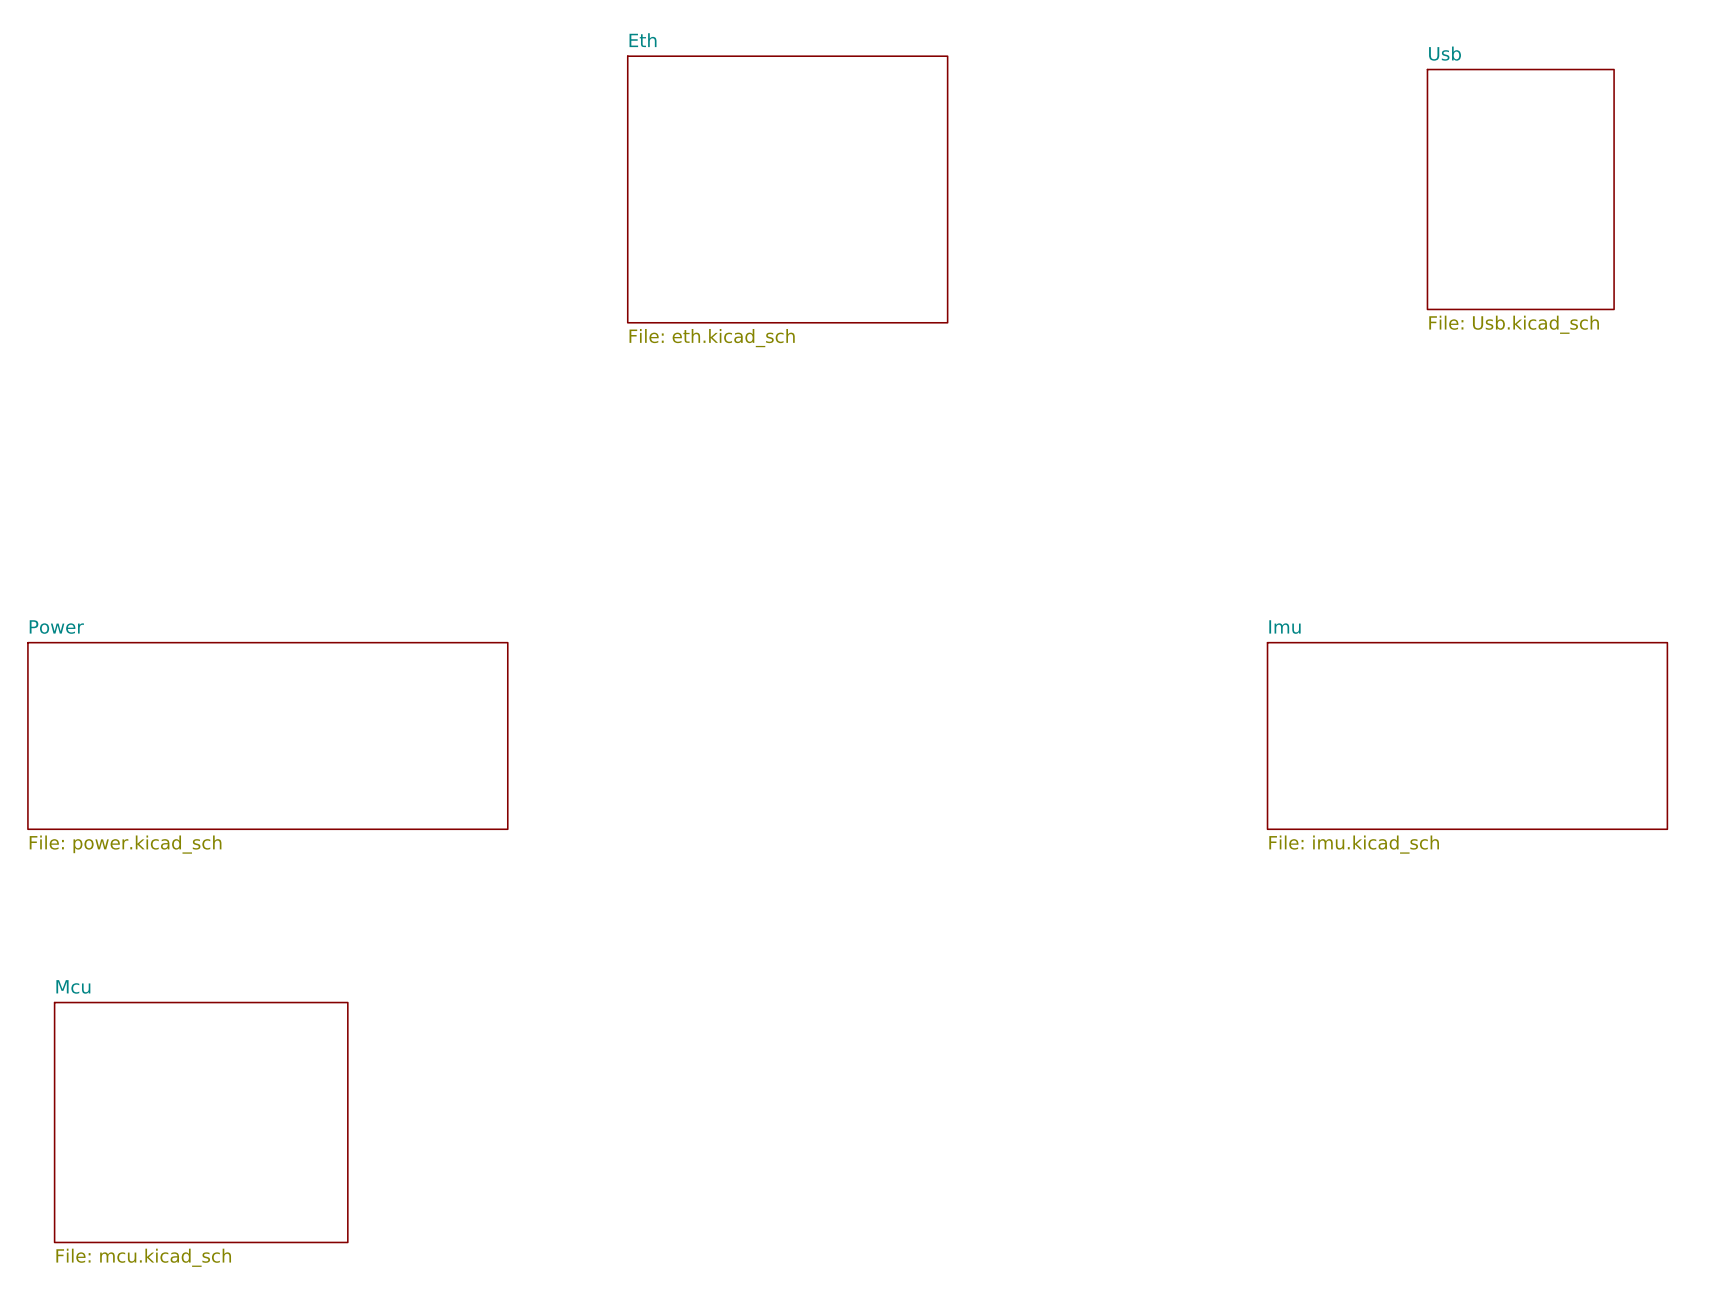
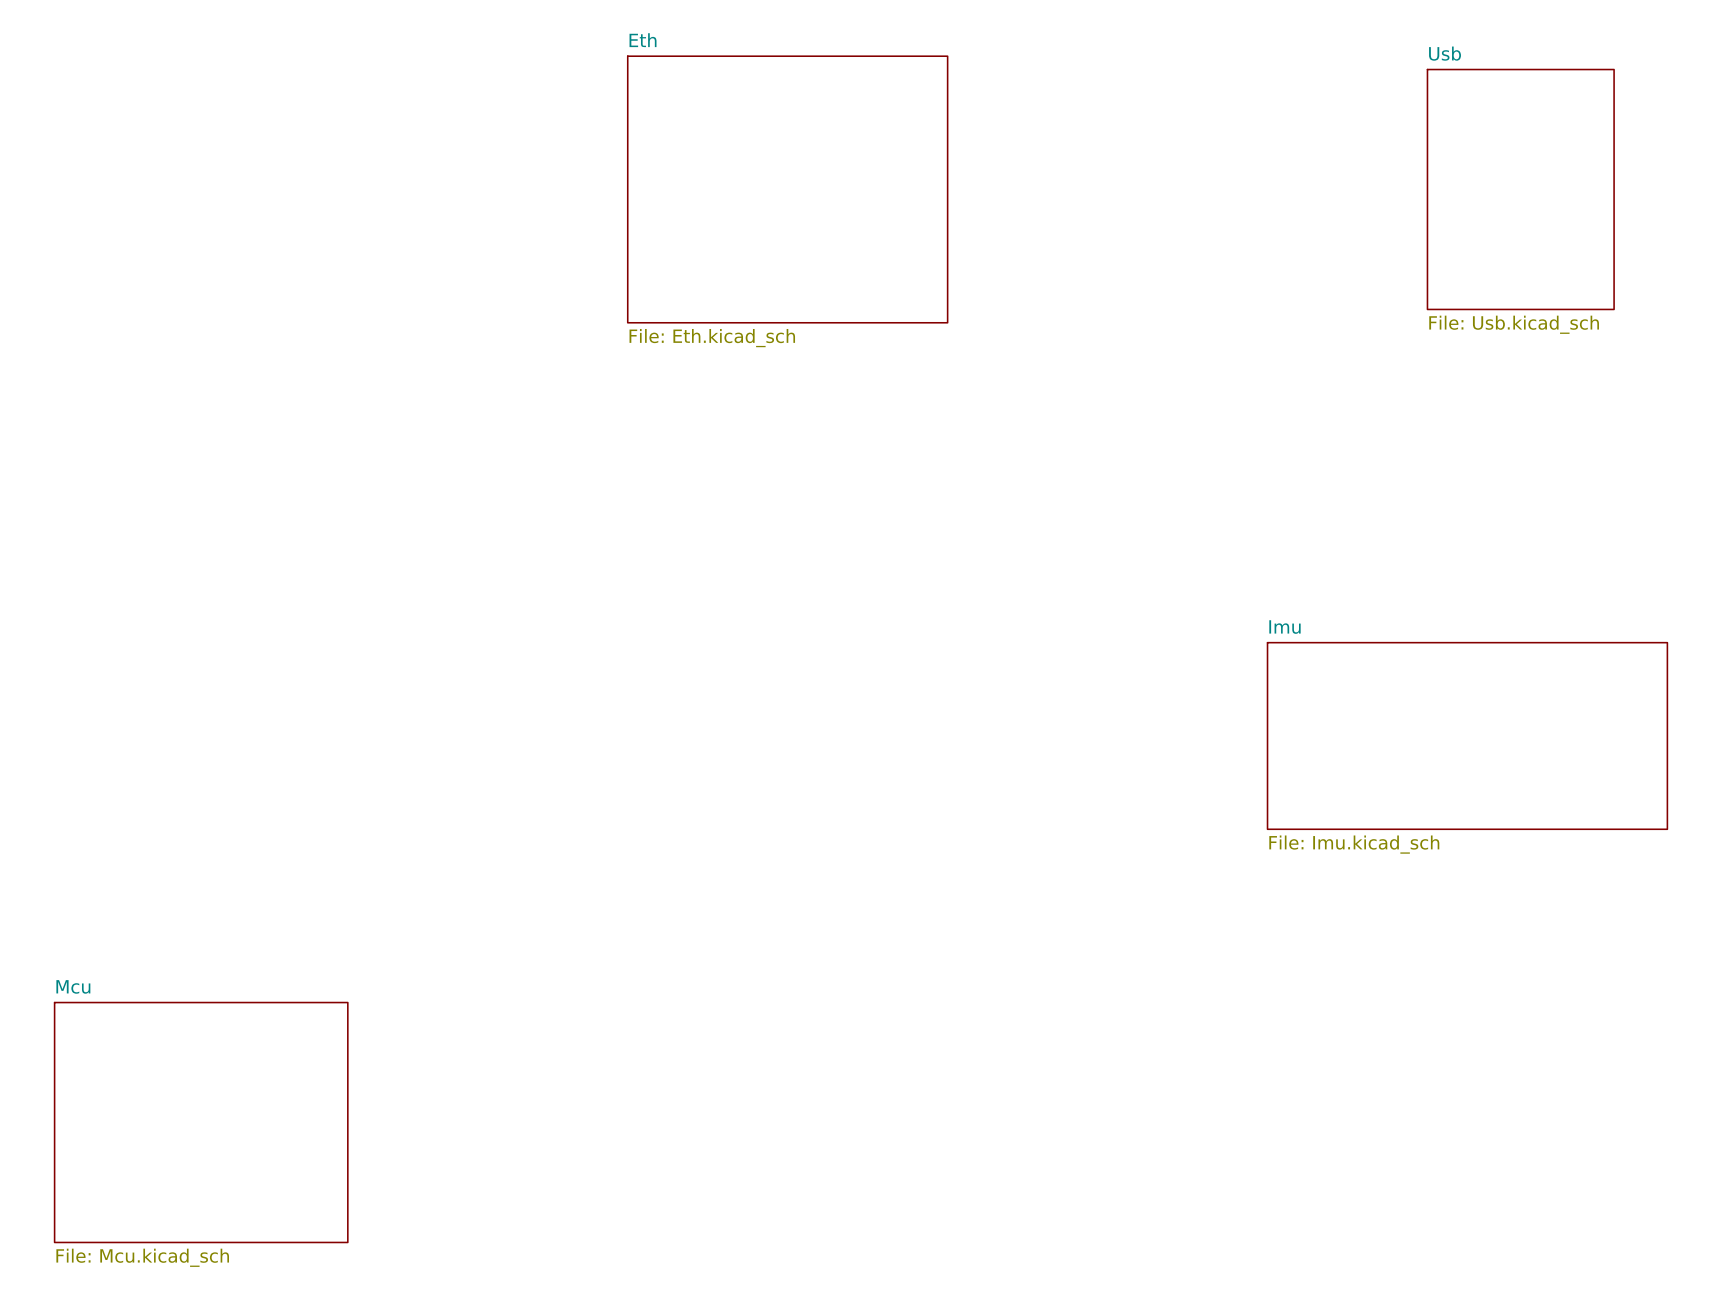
sheet Eth value: File: eth.kicad_sch (712, 338) -> File: Eth.kicad_sch (712, 338)
sheet Power: File: power.kicad_sch (267, 735) -> none
sheet Imu value: File: imu.kicad_sch (1354, 844) -> File: Imu.kicad_sch (1354, 844)
sheet Mcu value: File: mcu.kicad_sch (143, 1257) -> File: Mcu.kicad_sch (142, 1257)

